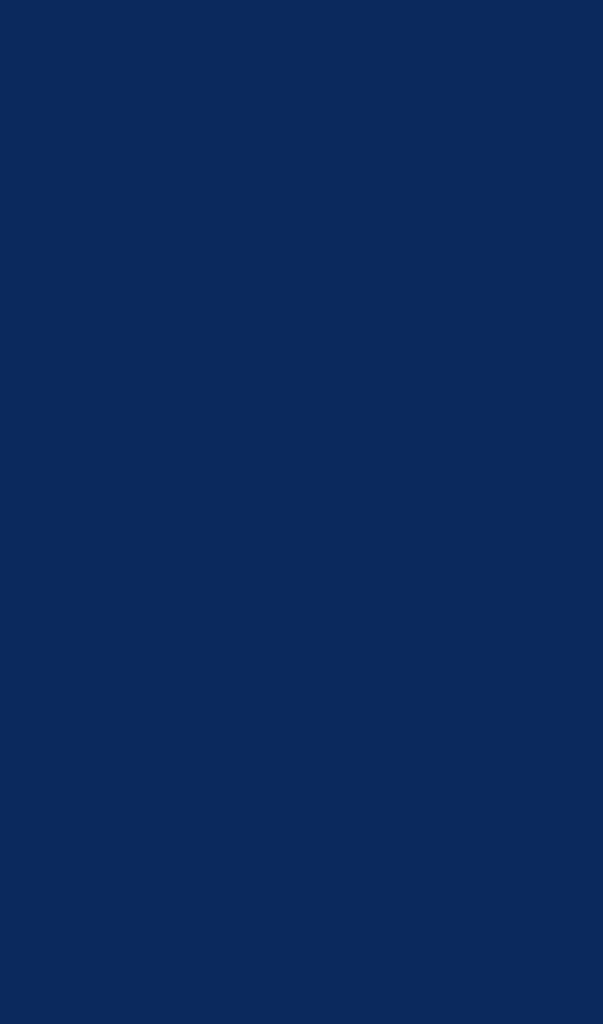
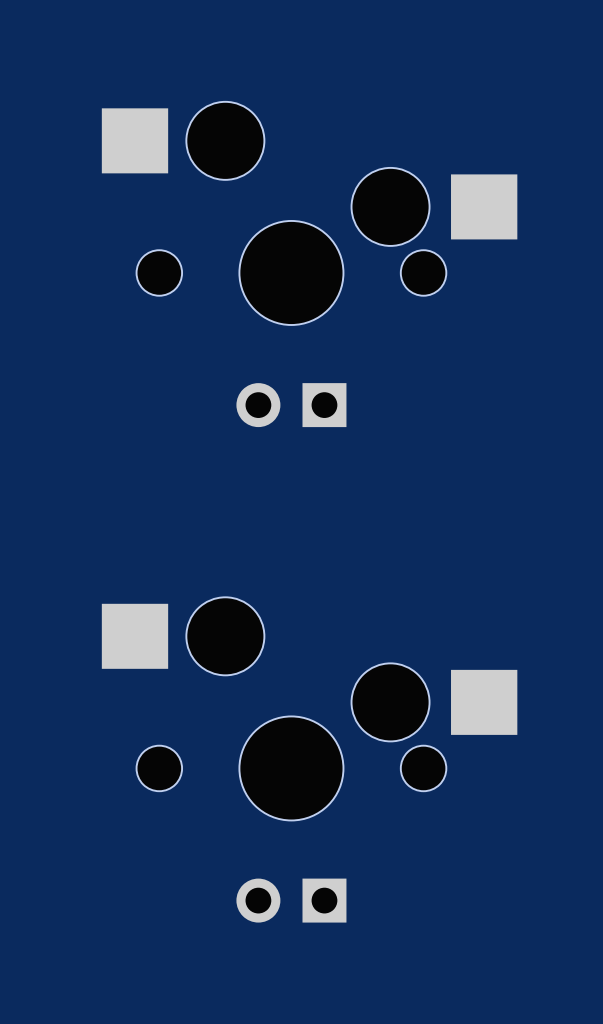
part: none -> (309, 264)
part: none -> (309, 759)

